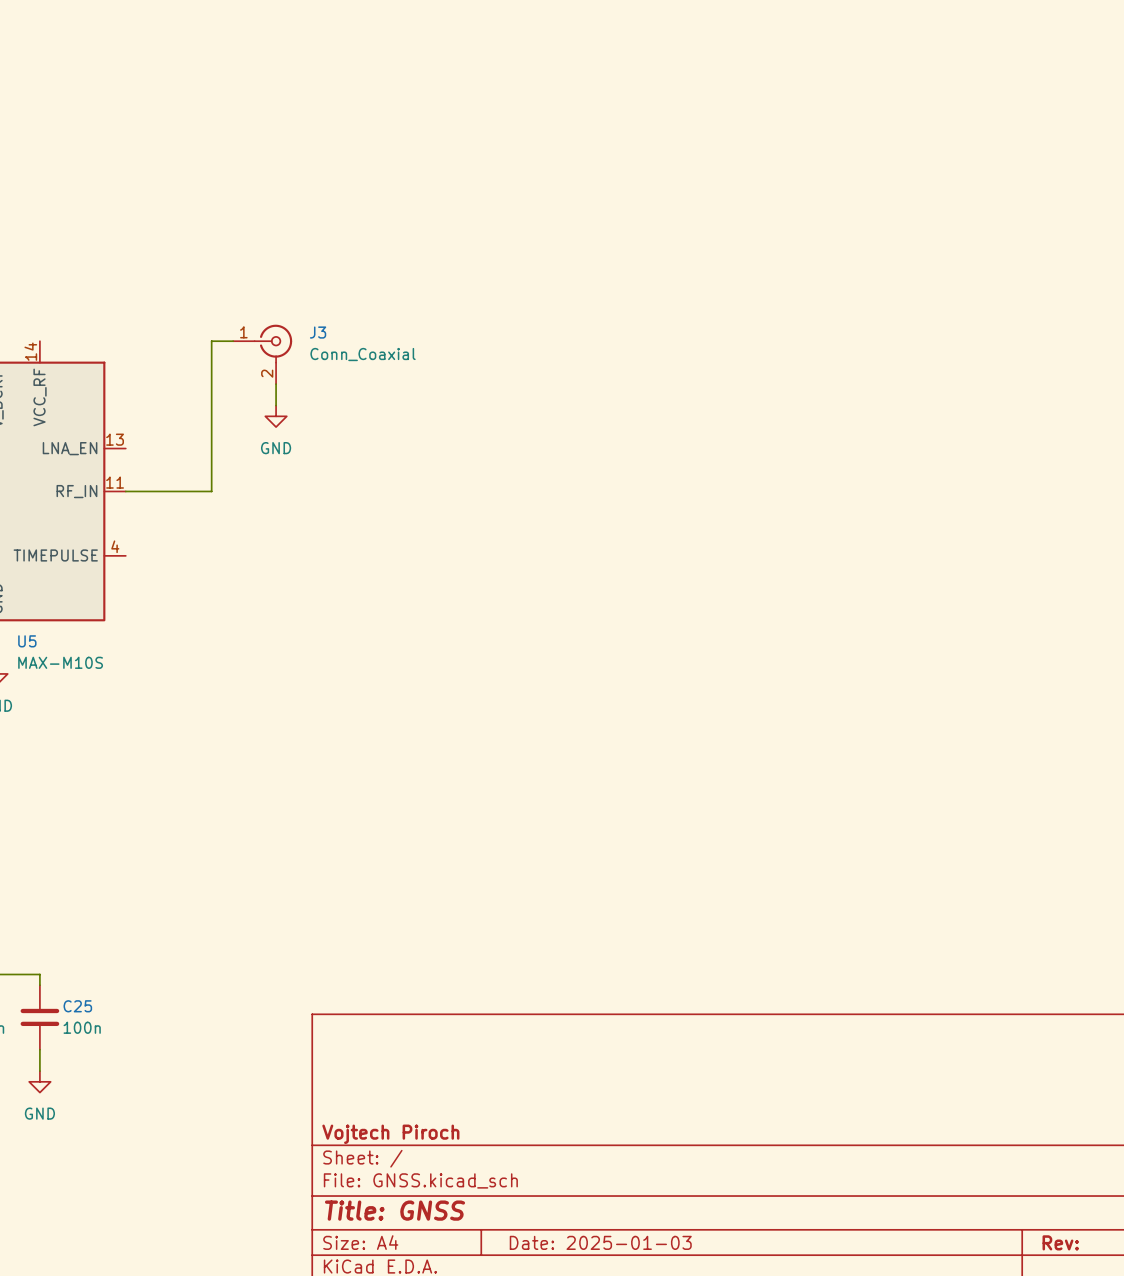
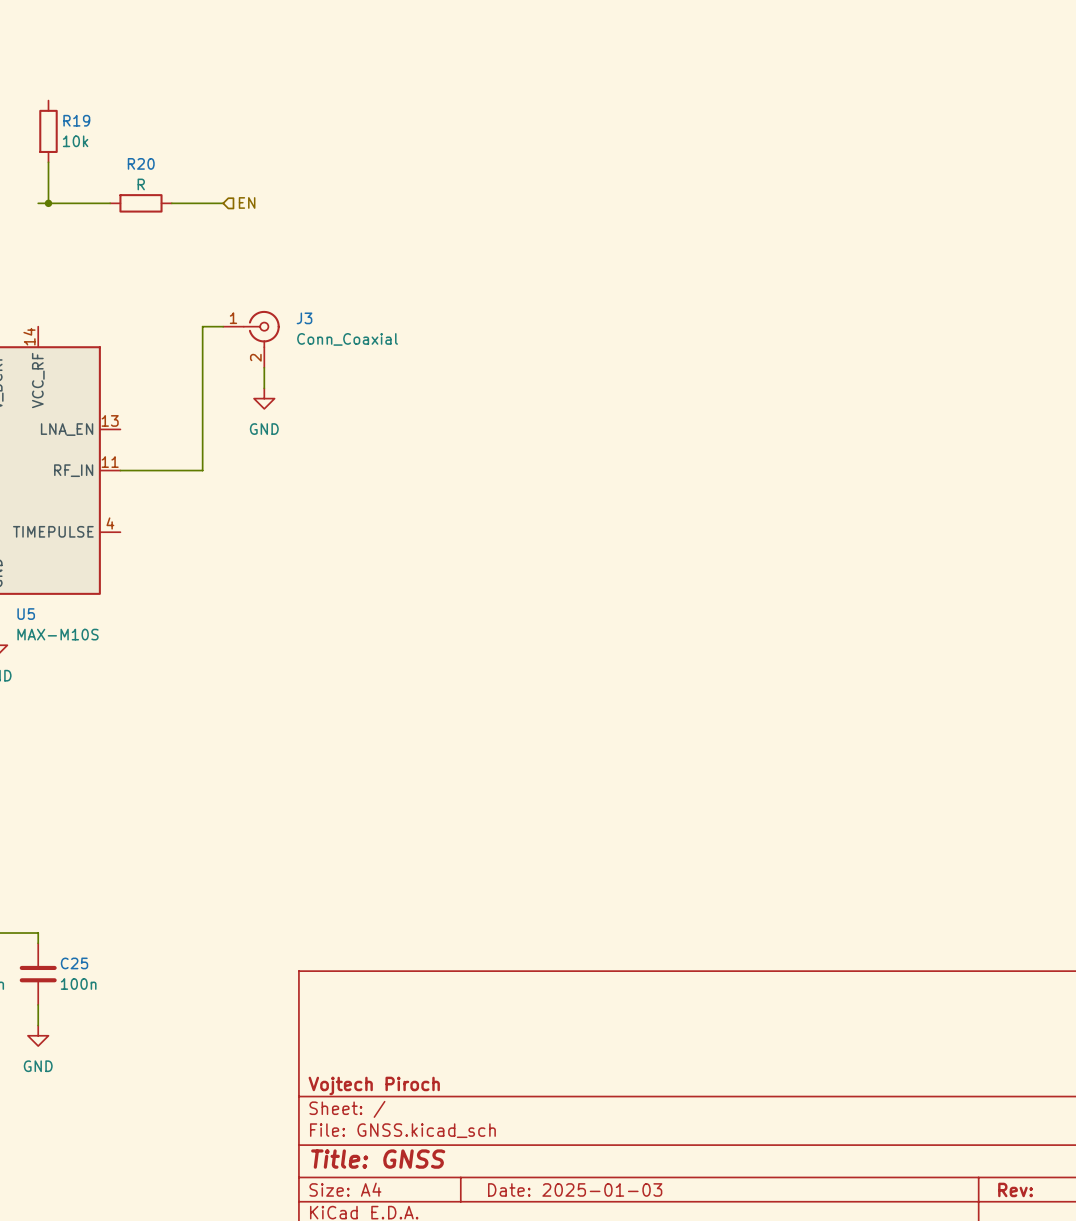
R19: none -> 10k (48, 131)
wire: none -> (48, 162) (48, 203)
hierarchical label: none -> EN (247, 202)
wire: none -> (38, 203) (110, 203)
junction: none -> (48, 203)
R20: none -> R (140, 203)
wire: none -> (171, 203) (223, 203)

